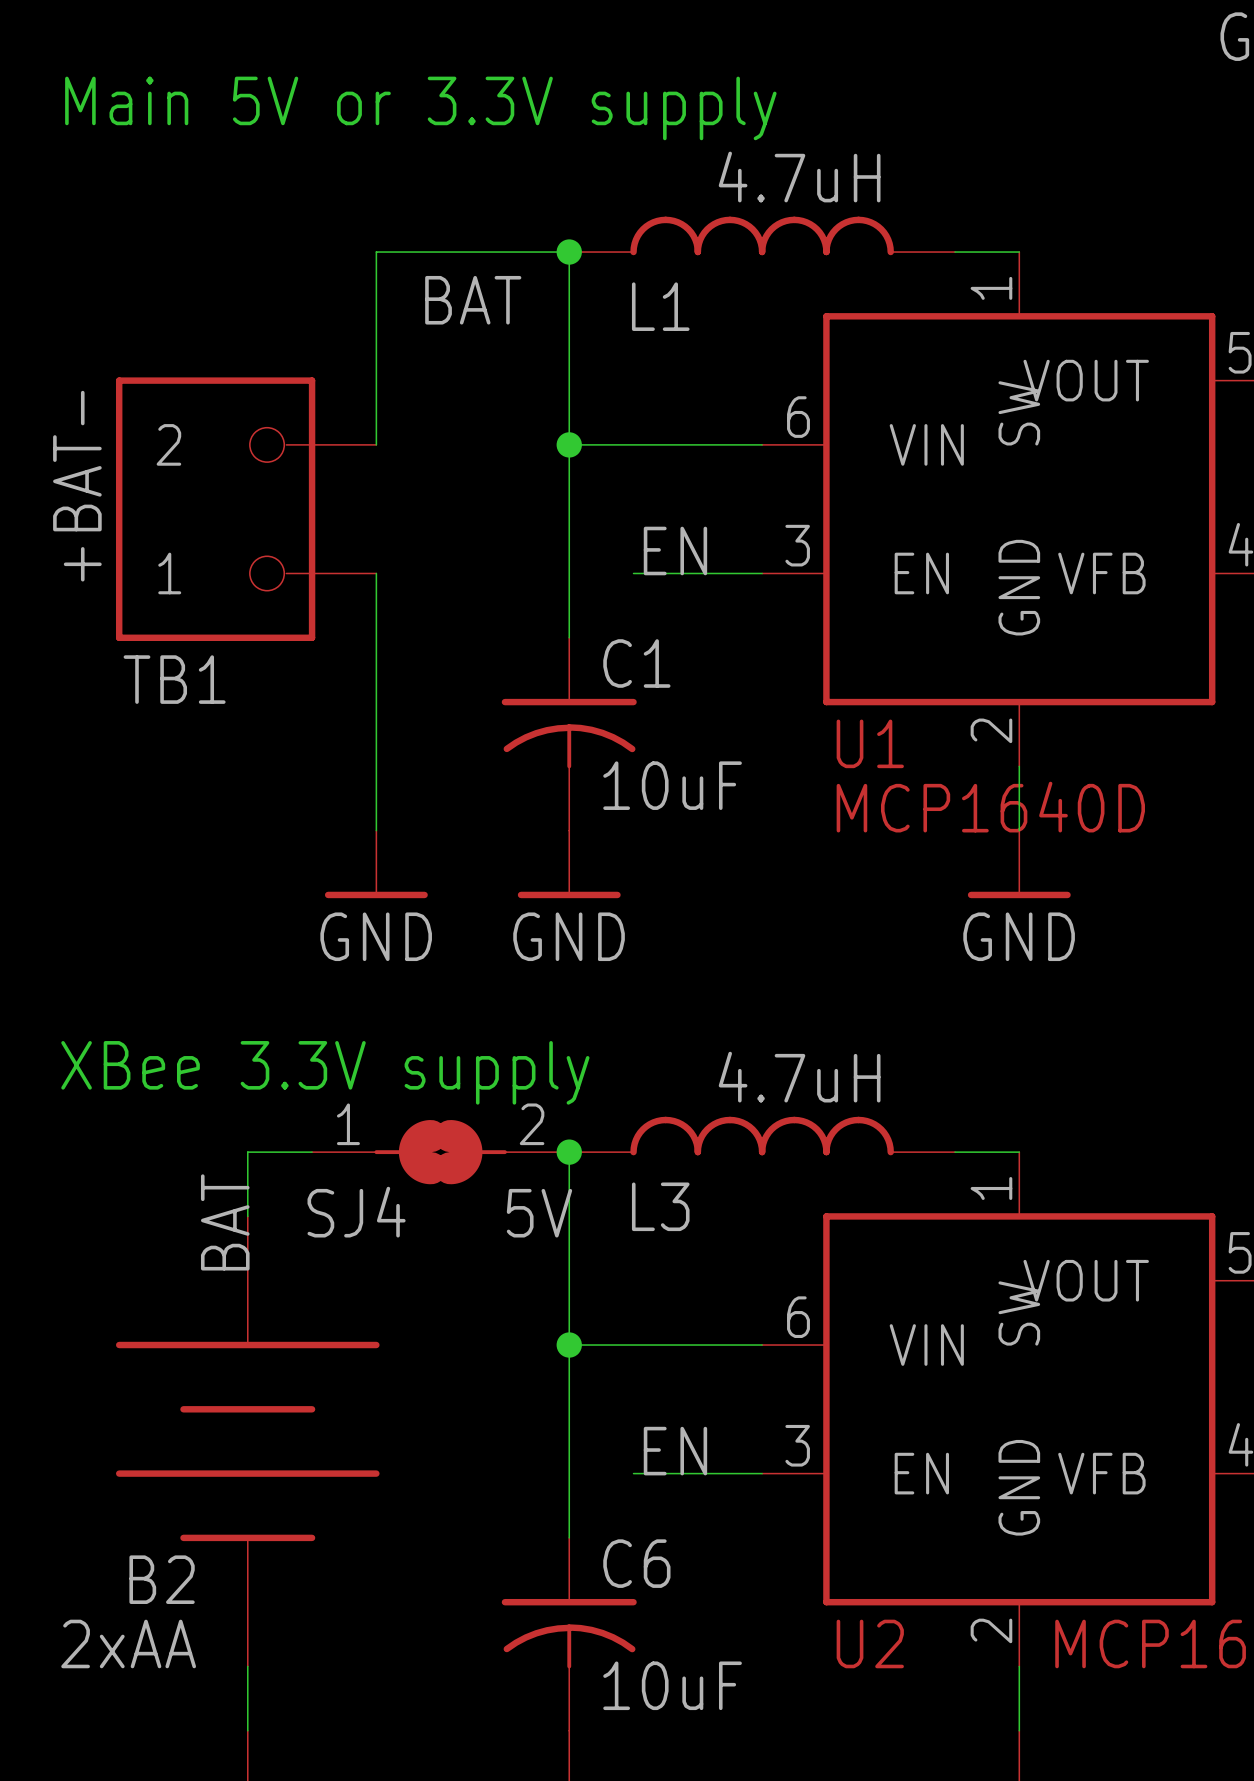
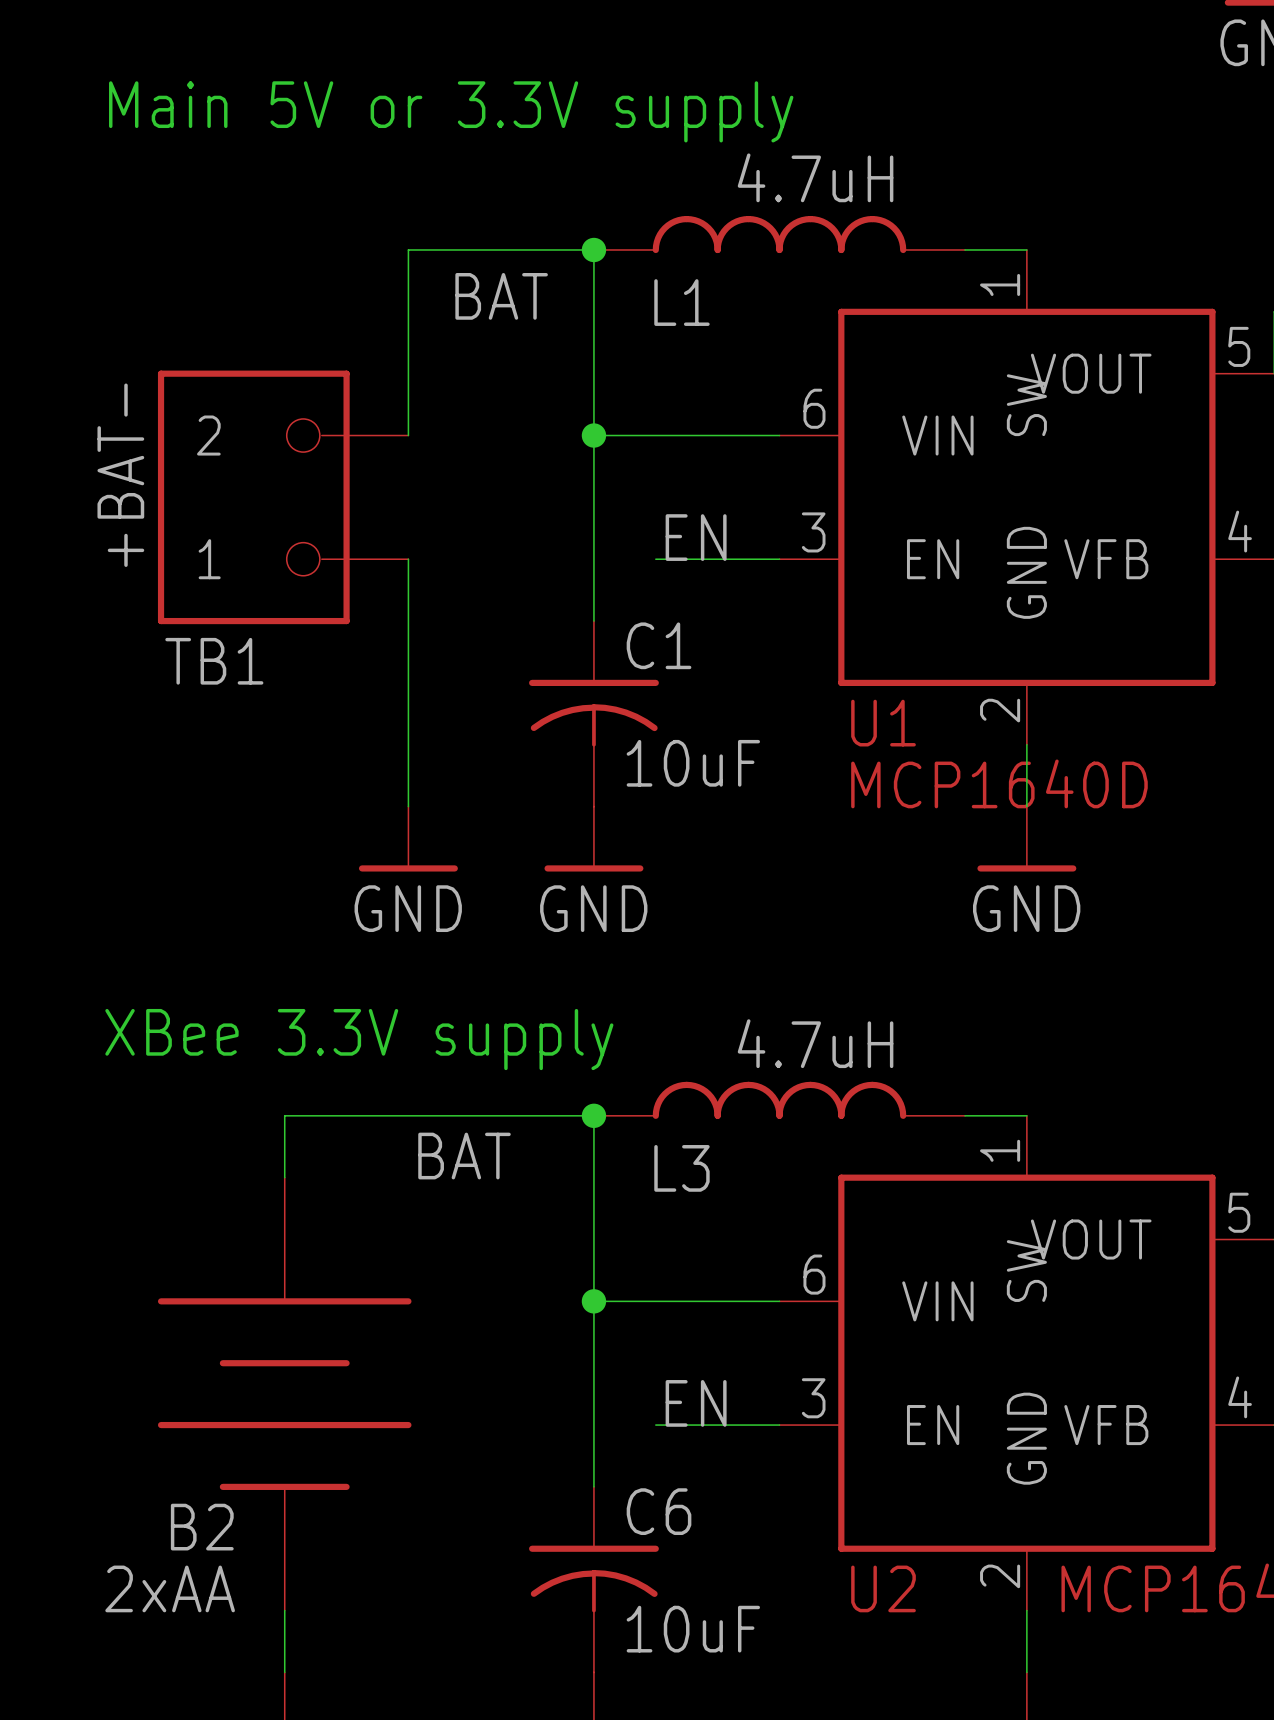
SJ4: 5V (440, 1152) -> none
label rotation: 0° (225, 1222) -> 90° clockwise (464, 1156)
label position: BAT (225, 1222) -> BAT (464, 1156)

